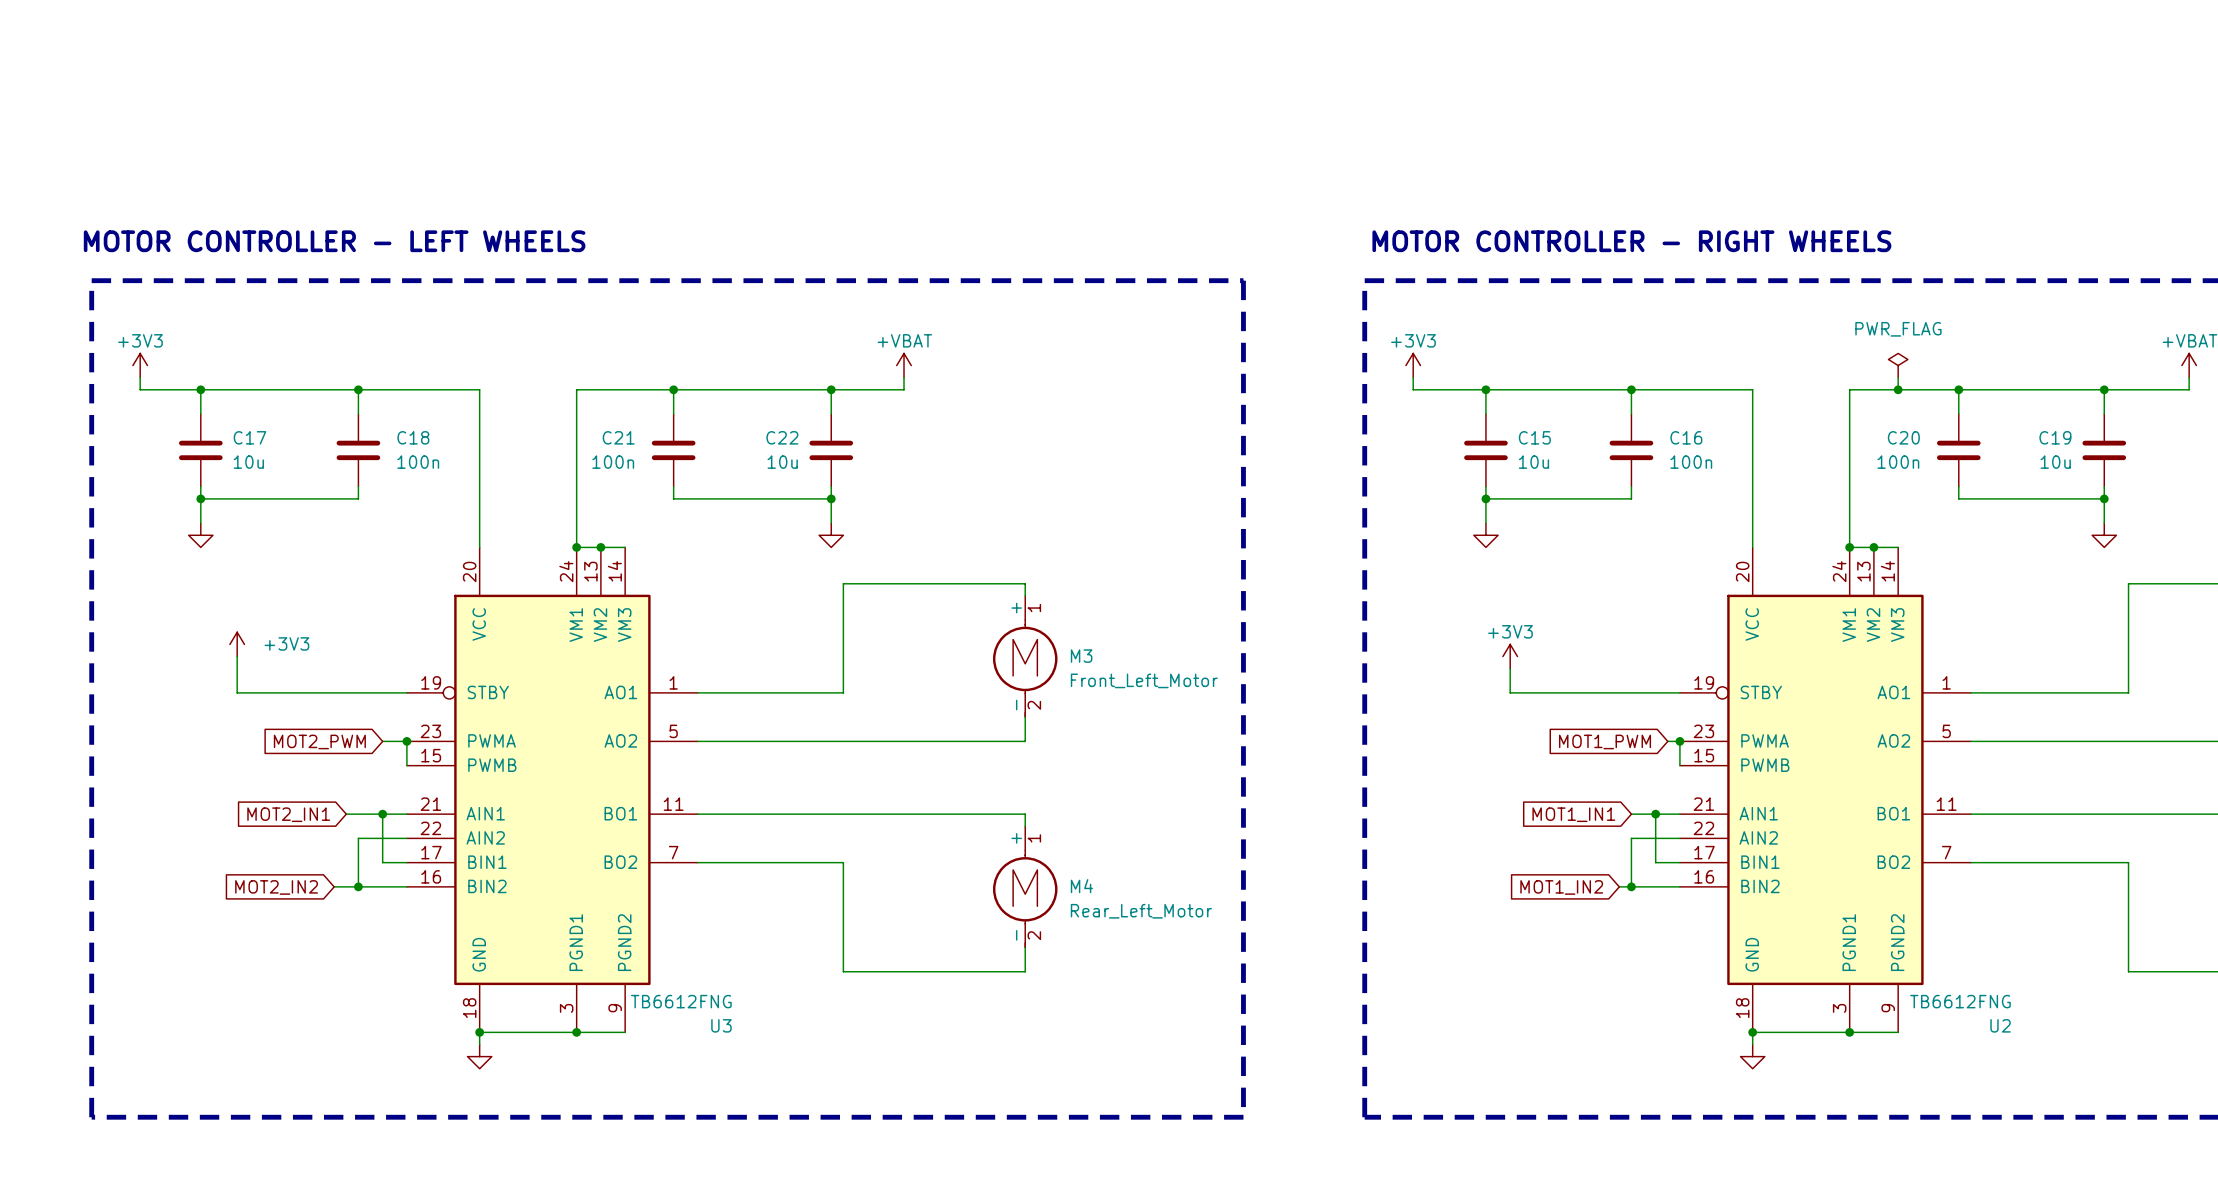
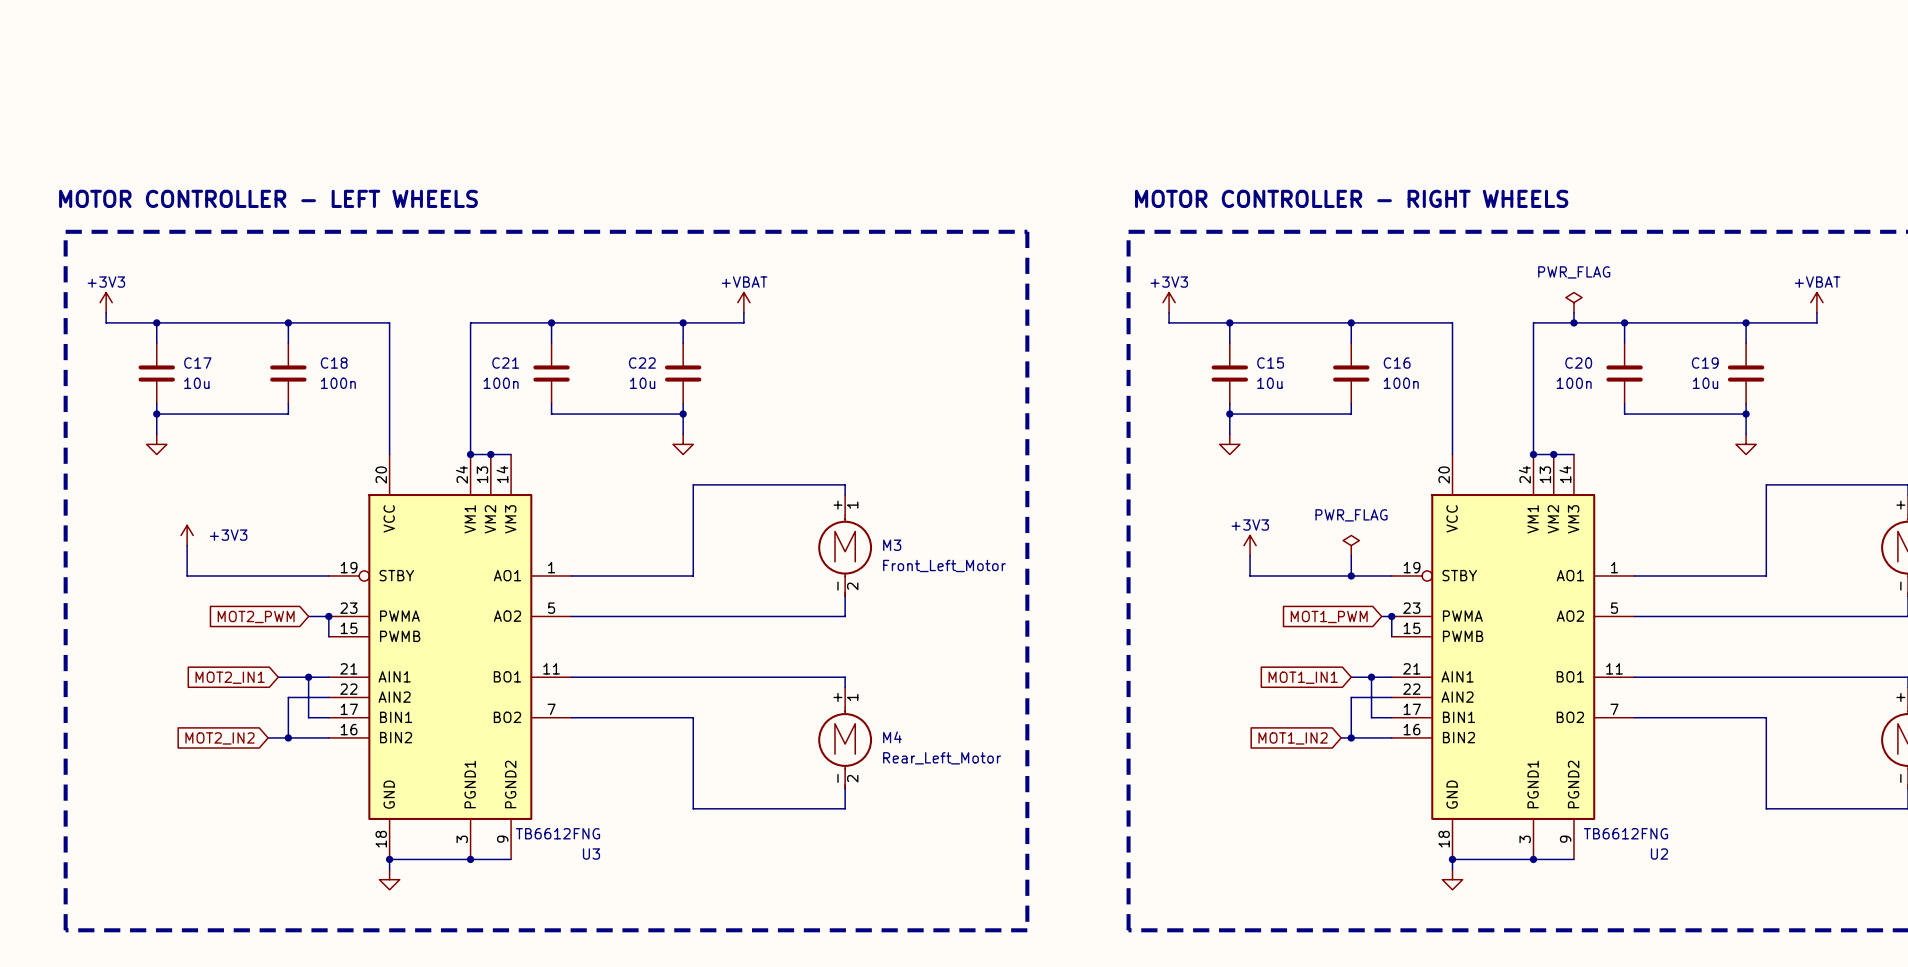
power symbol: none -> PWR_FLAG (1351, 545)
wire: none -> (1351, 555) (1351, 575)
junction: none -> (1351, 575)

